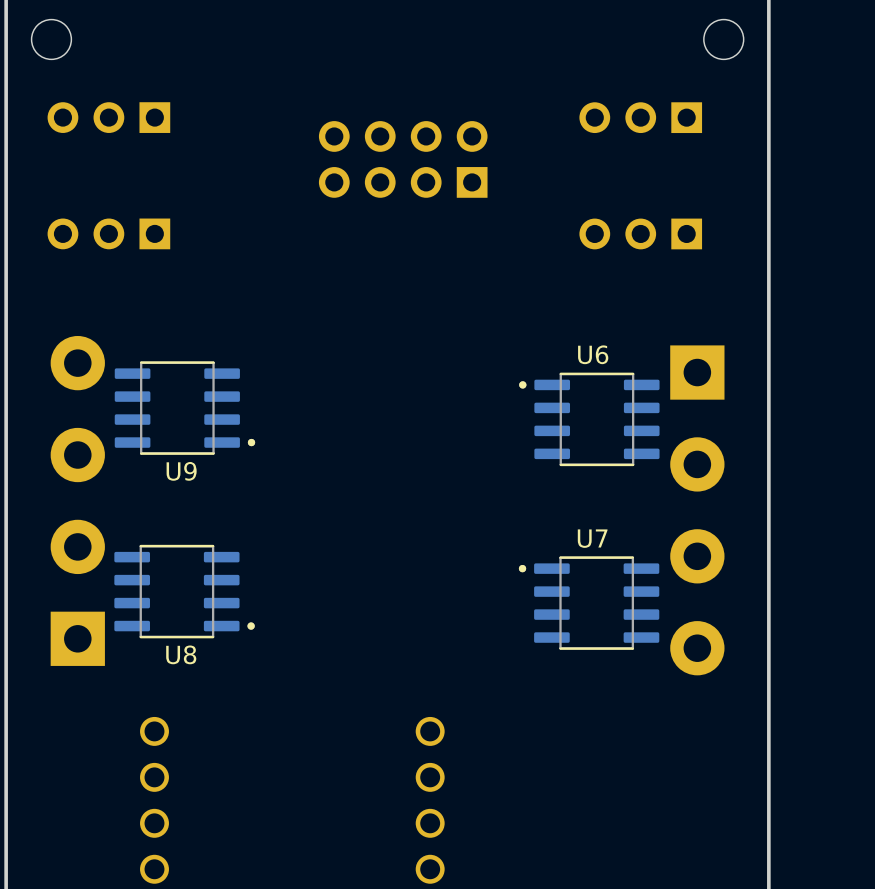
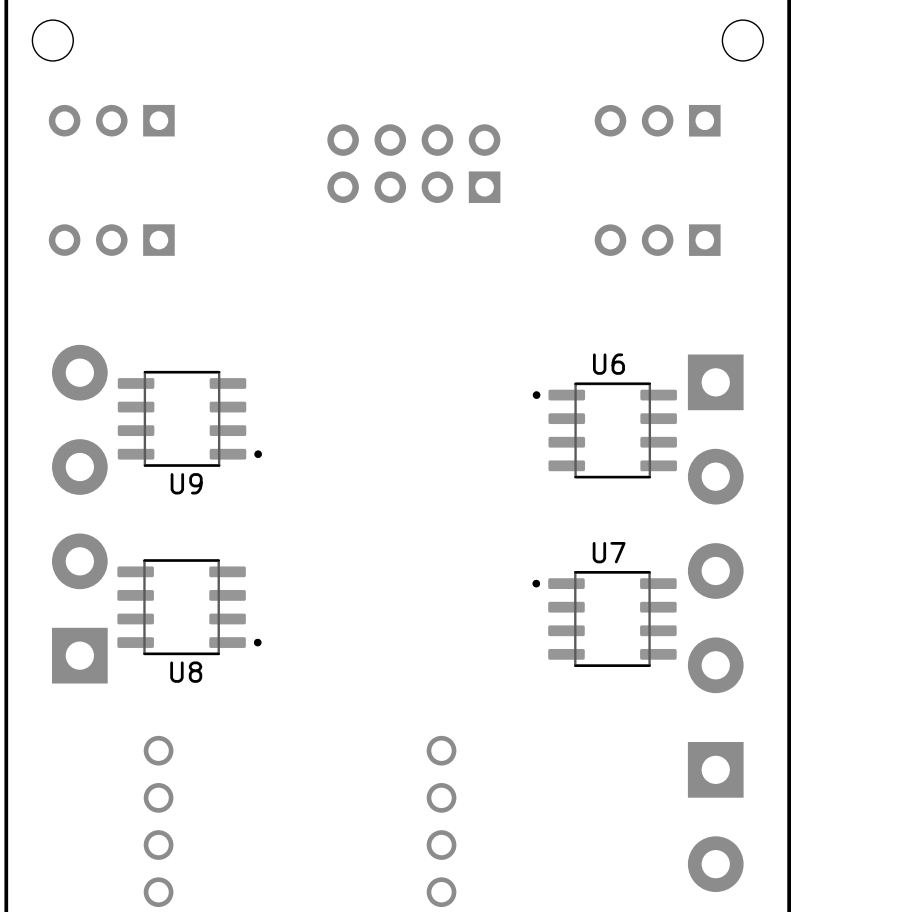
part: none -> (715, 817)

